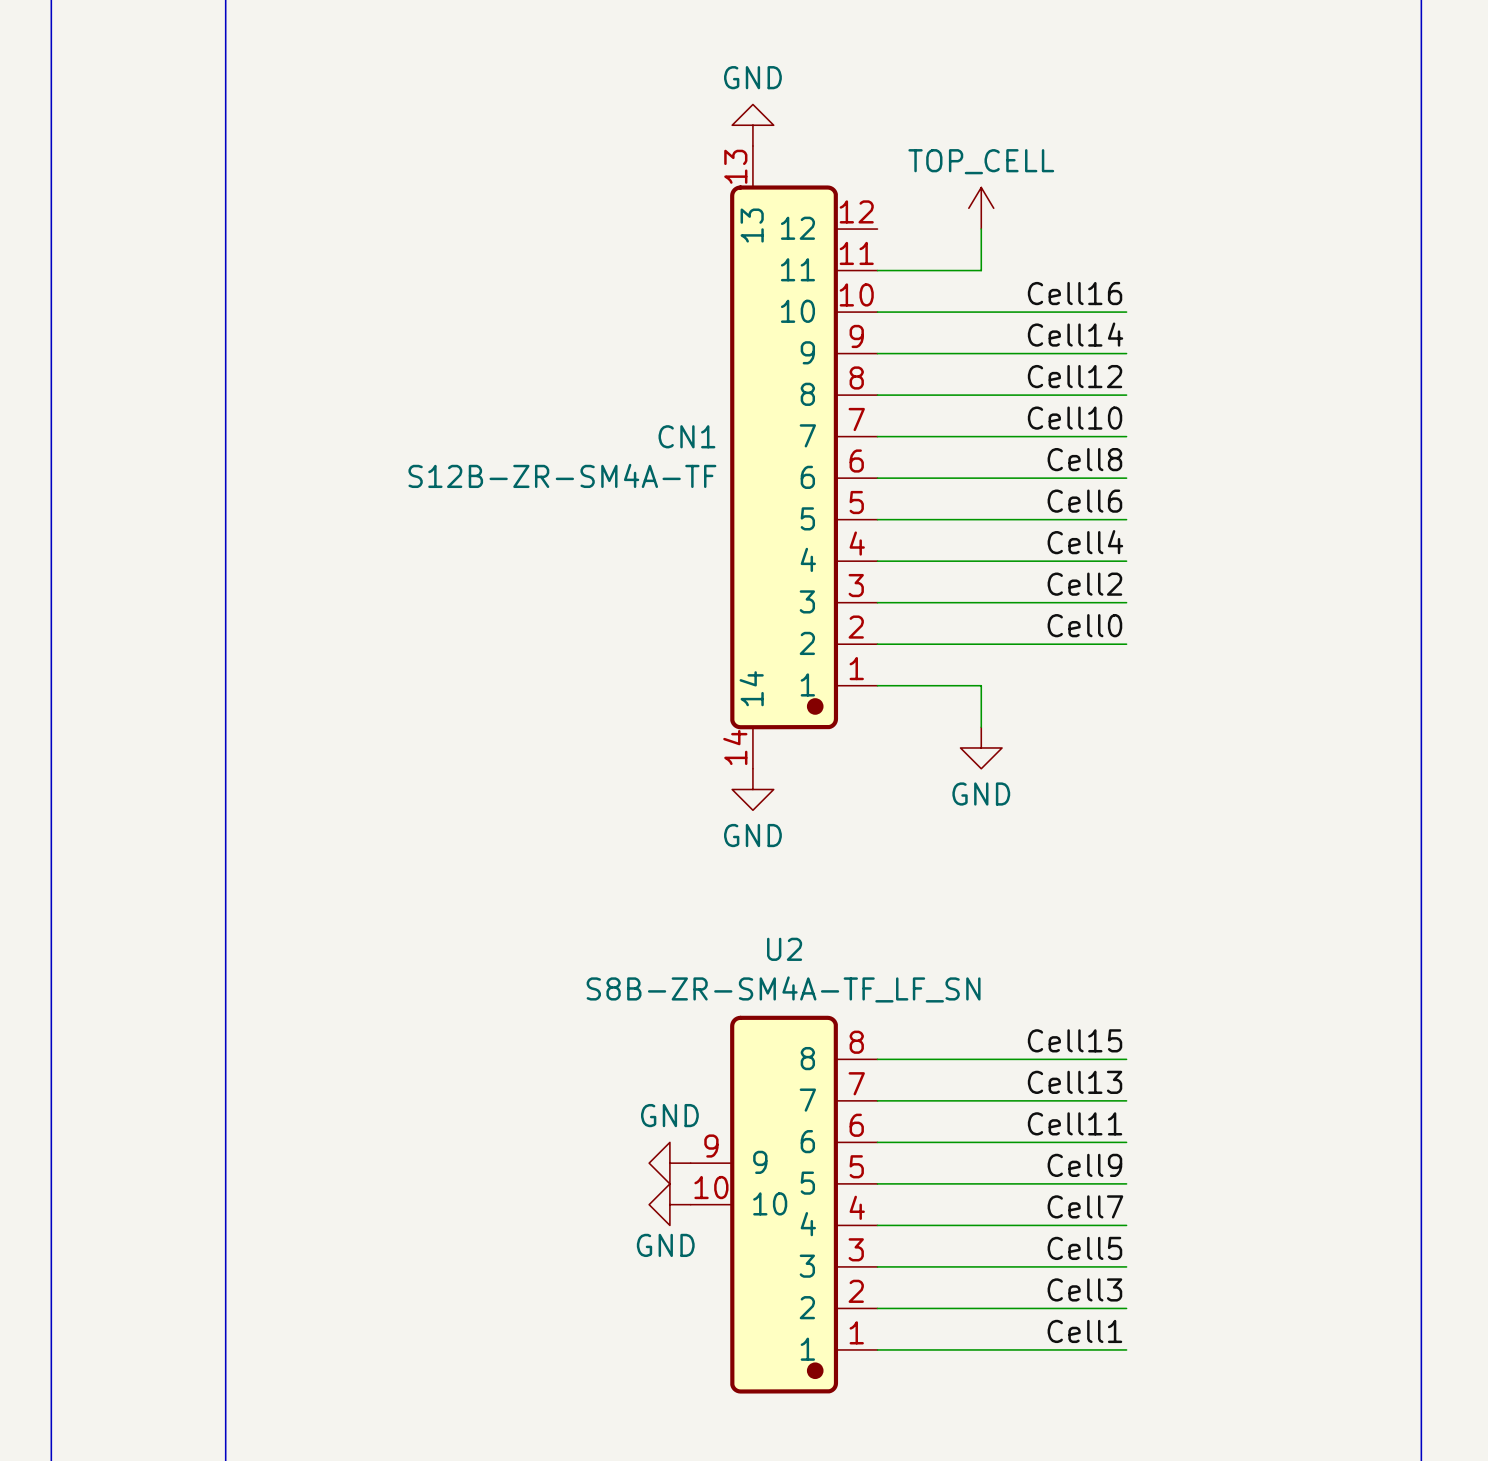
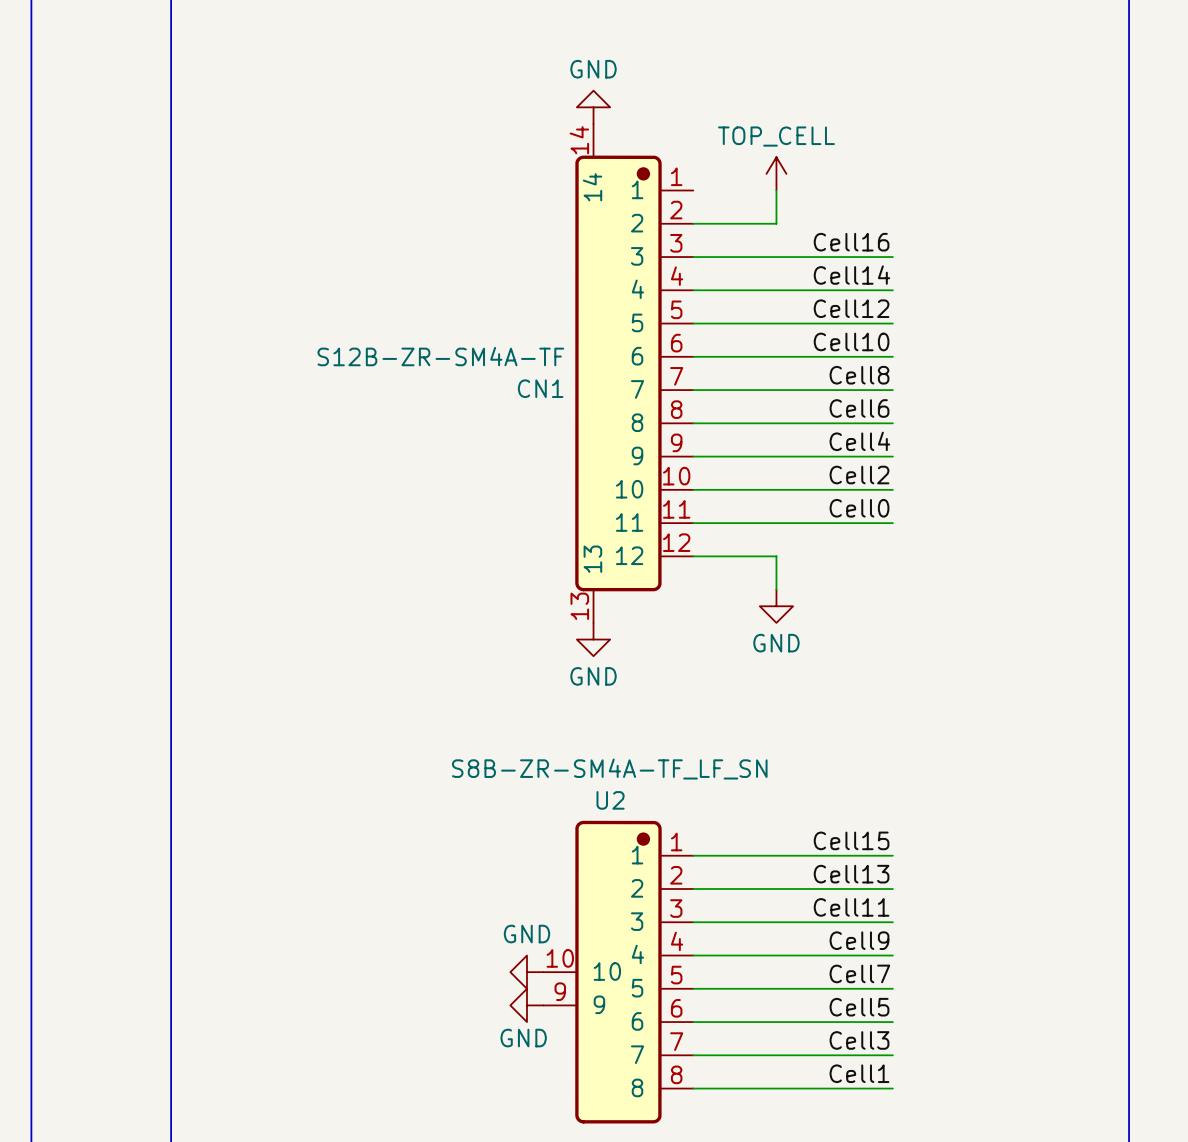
CN1 flip: as is (784, 457) -> up-down (618, 373)
U2 name position: U2 (784, 949) -> U2 (610, 800)
U2 value position: S8B-ZR-SM4A-TF_LF_SN (783, 989) -> S8B-ZR-SM4A-TF_LF_SN (609, 769)
power symbol text position: GND (669, 1115) -> GND (523, 1038)
power symbol position: GND (669, 1163) -> GND (526, 1005)
U2 flip: as is (784, 1204) -> up-down (618, 972)
power symbol text position: GND (665, 1245) -> GND (526, 934)

